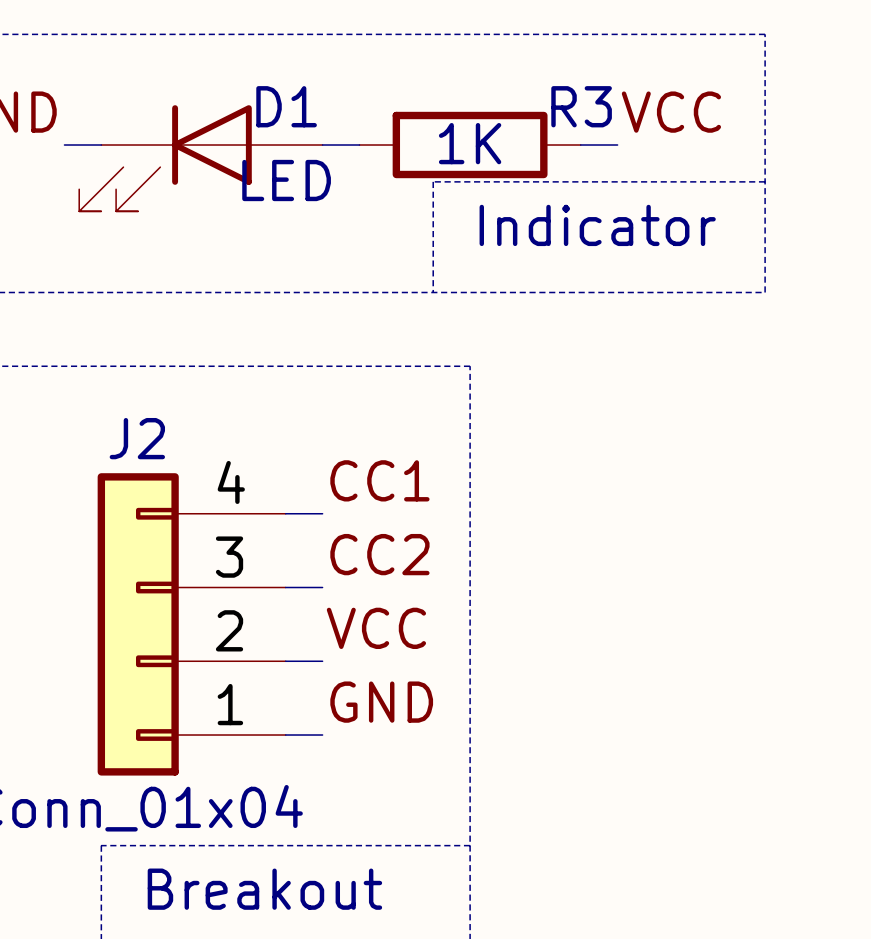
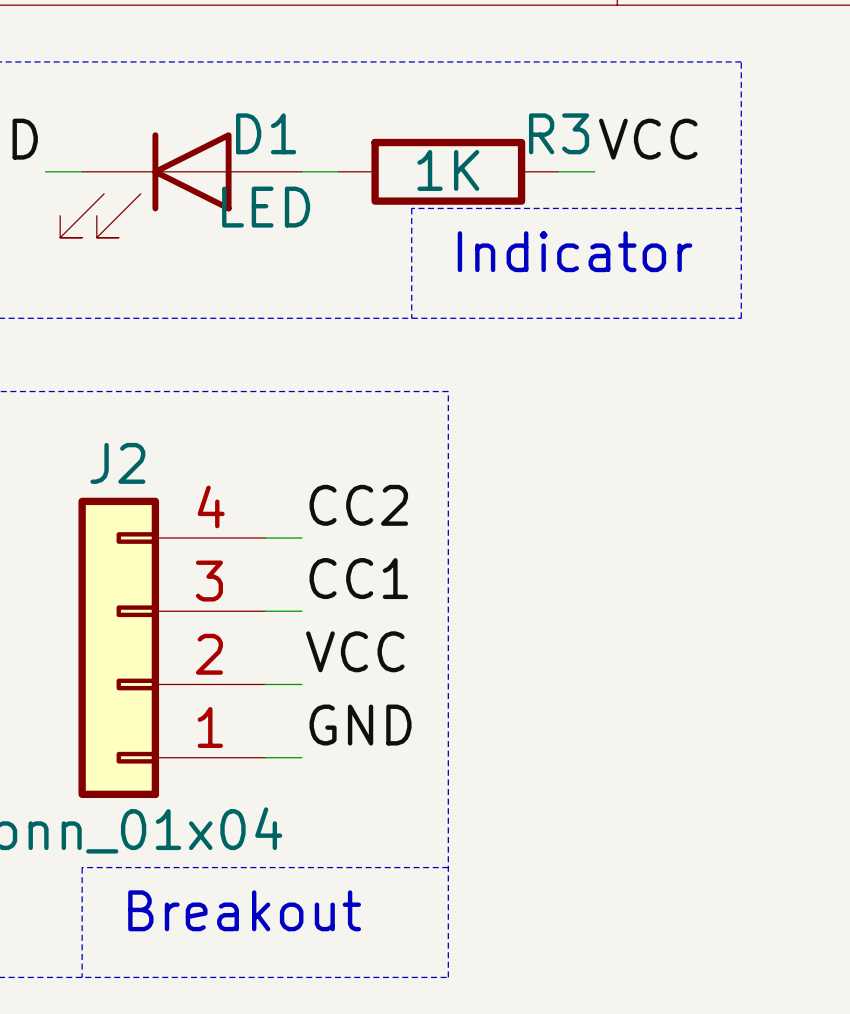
label: CC1 (379, 480) -> CC2 (358, 505)
label: CC2 (379, 554) -> CC1 (358, 578)

